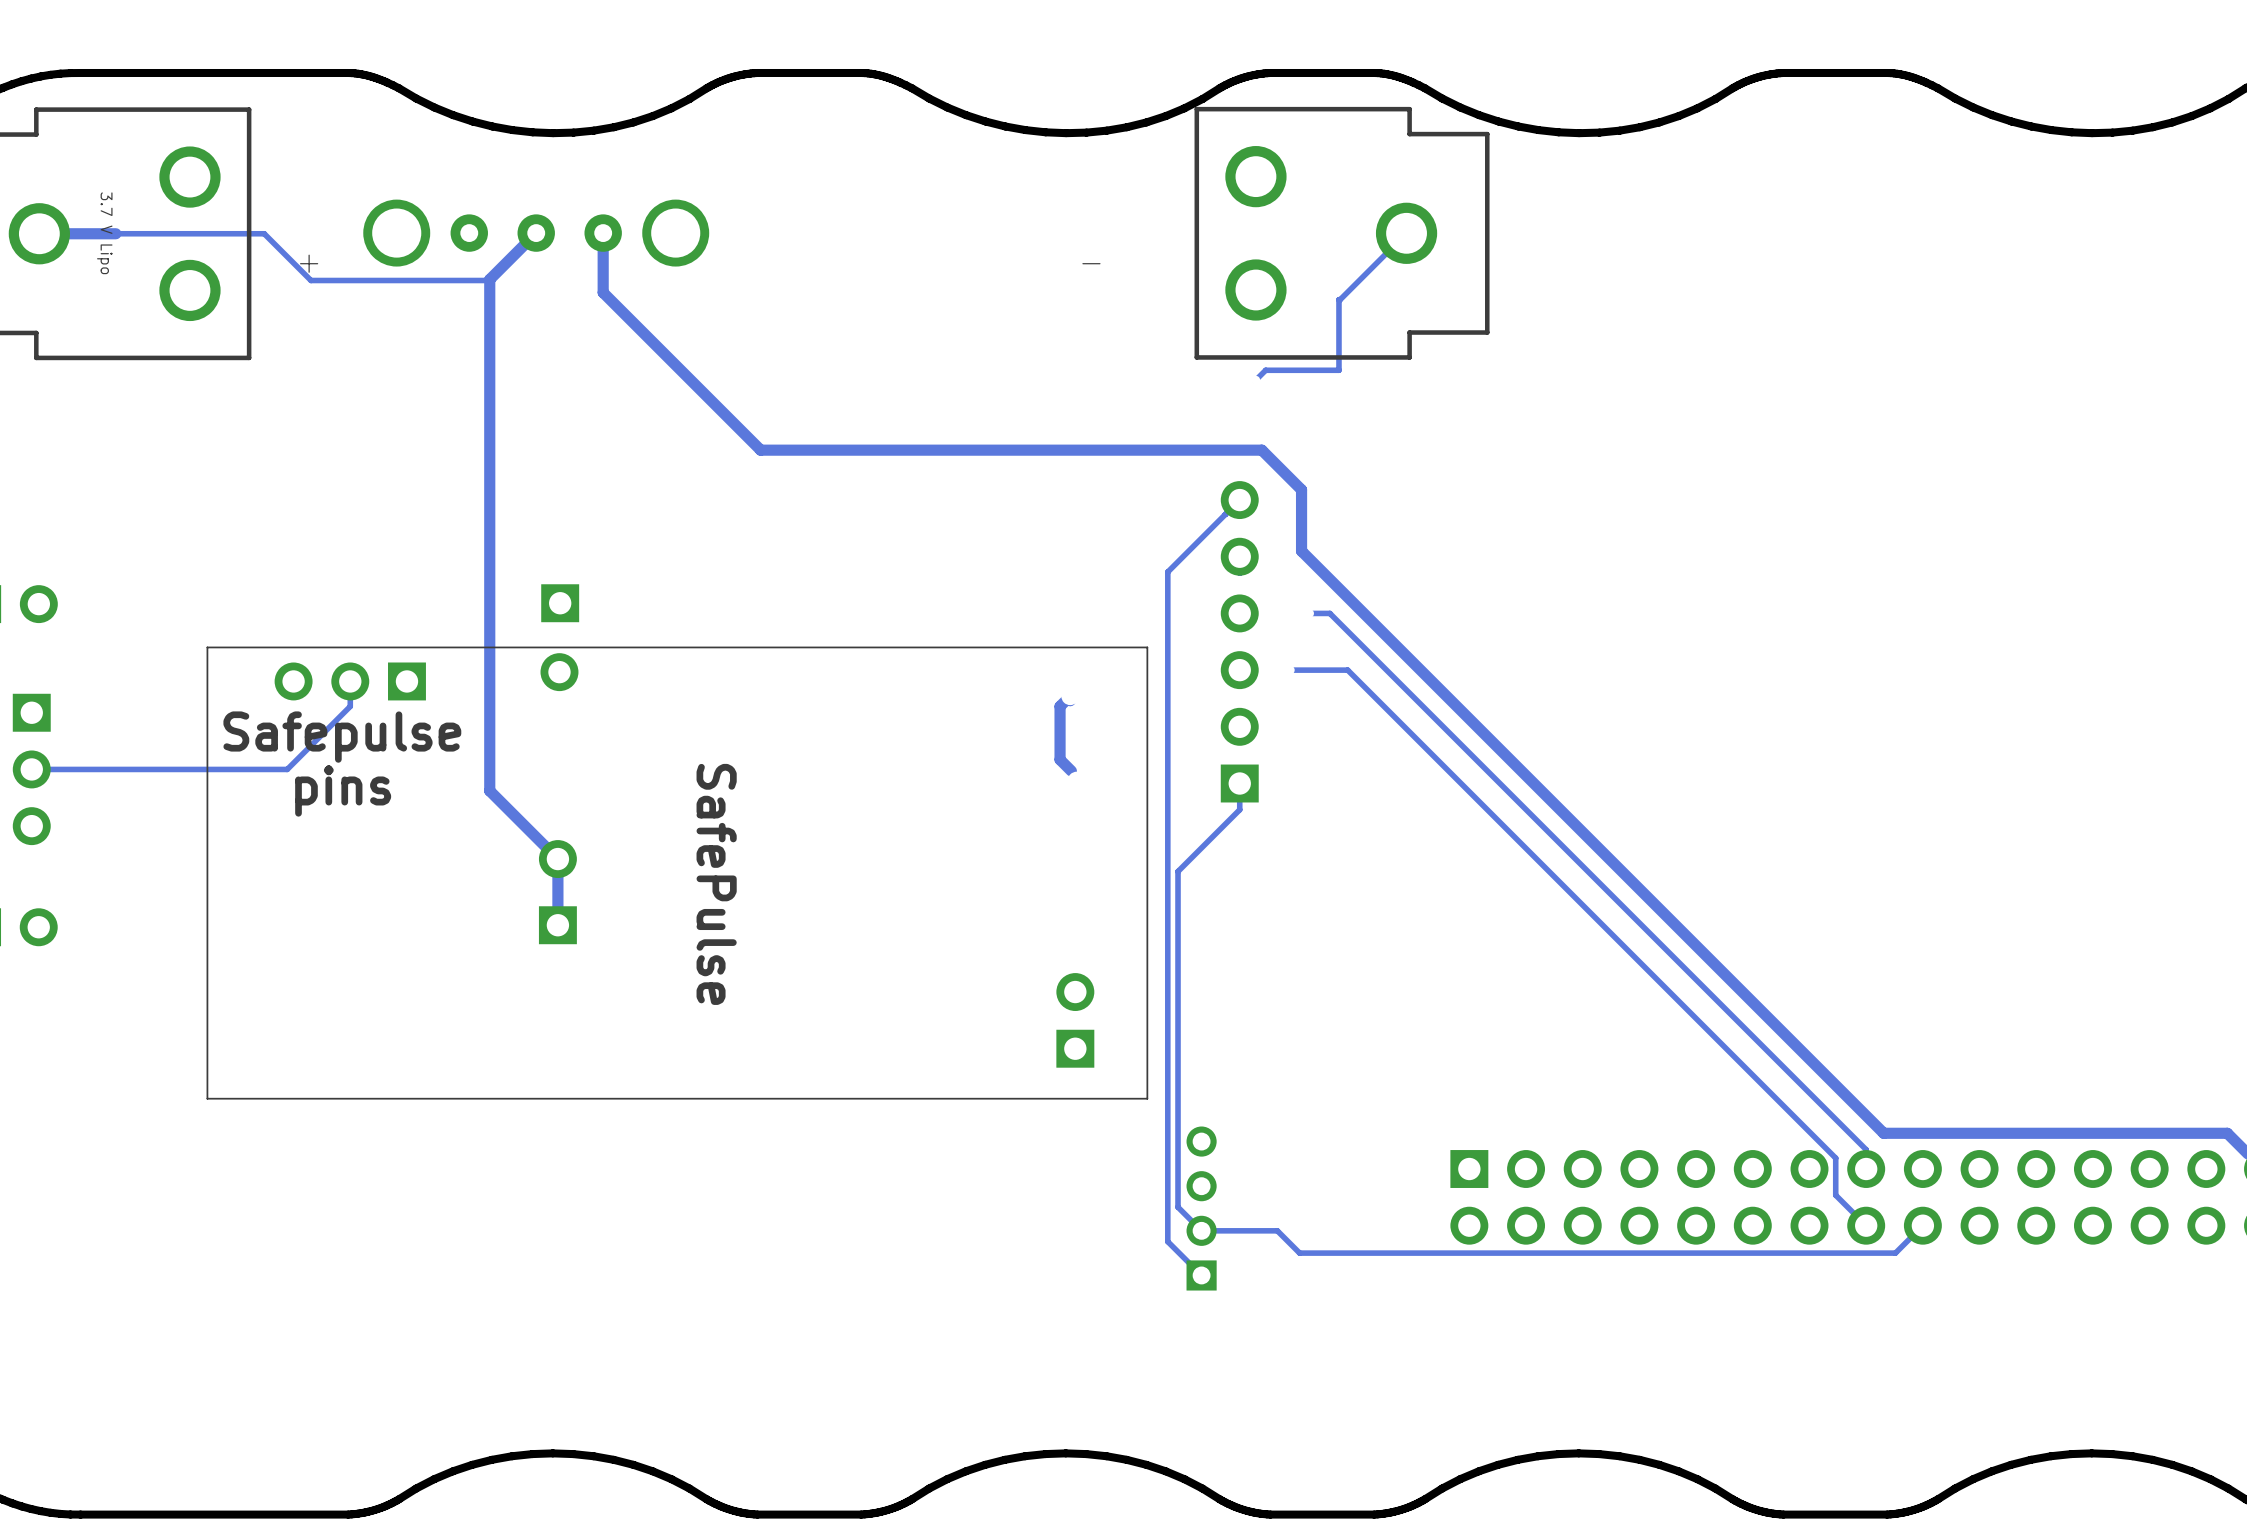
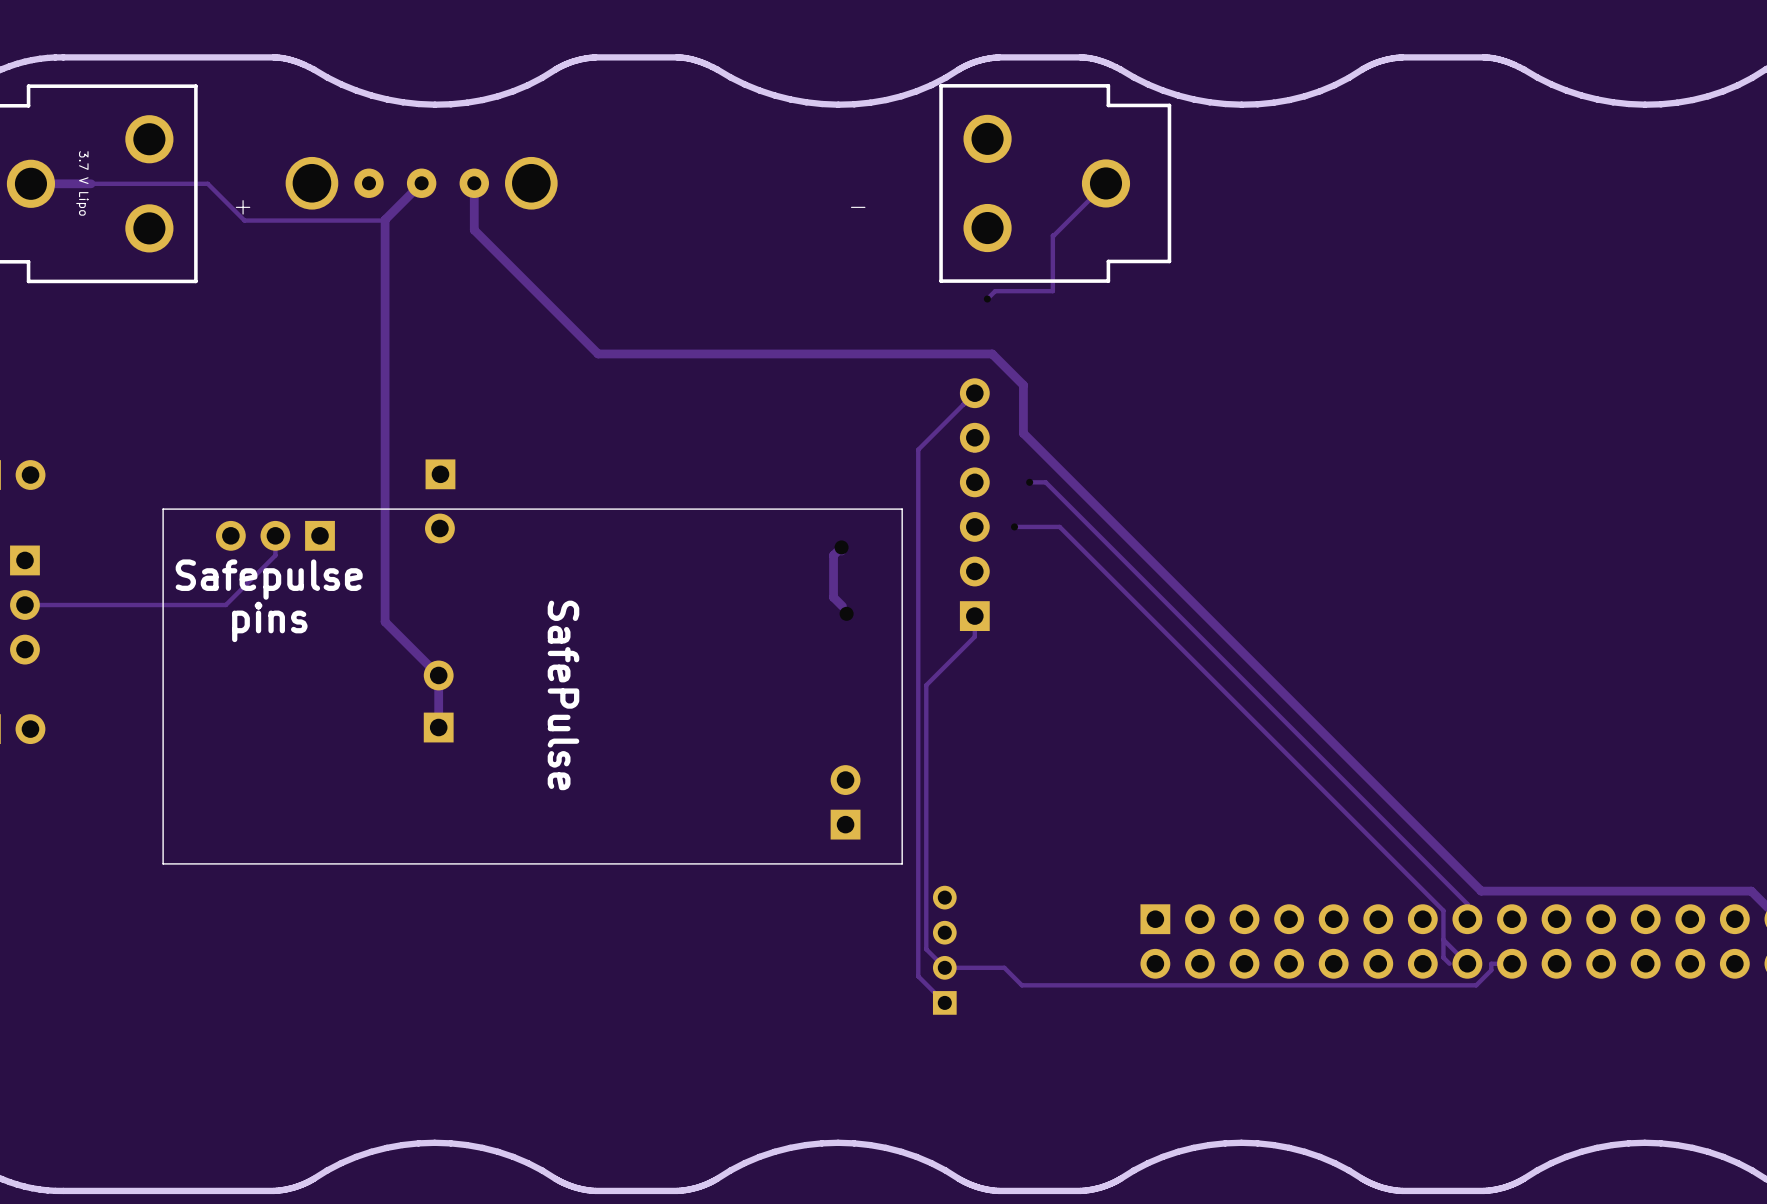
track: none -> (1443, 939) (1443, 957) (1449, 963)
track: (1922, 1225) (1895, 1253) (1877, 1253) -> (1511, 963) (1491, 963) (1491, 970) (1476, 985)

